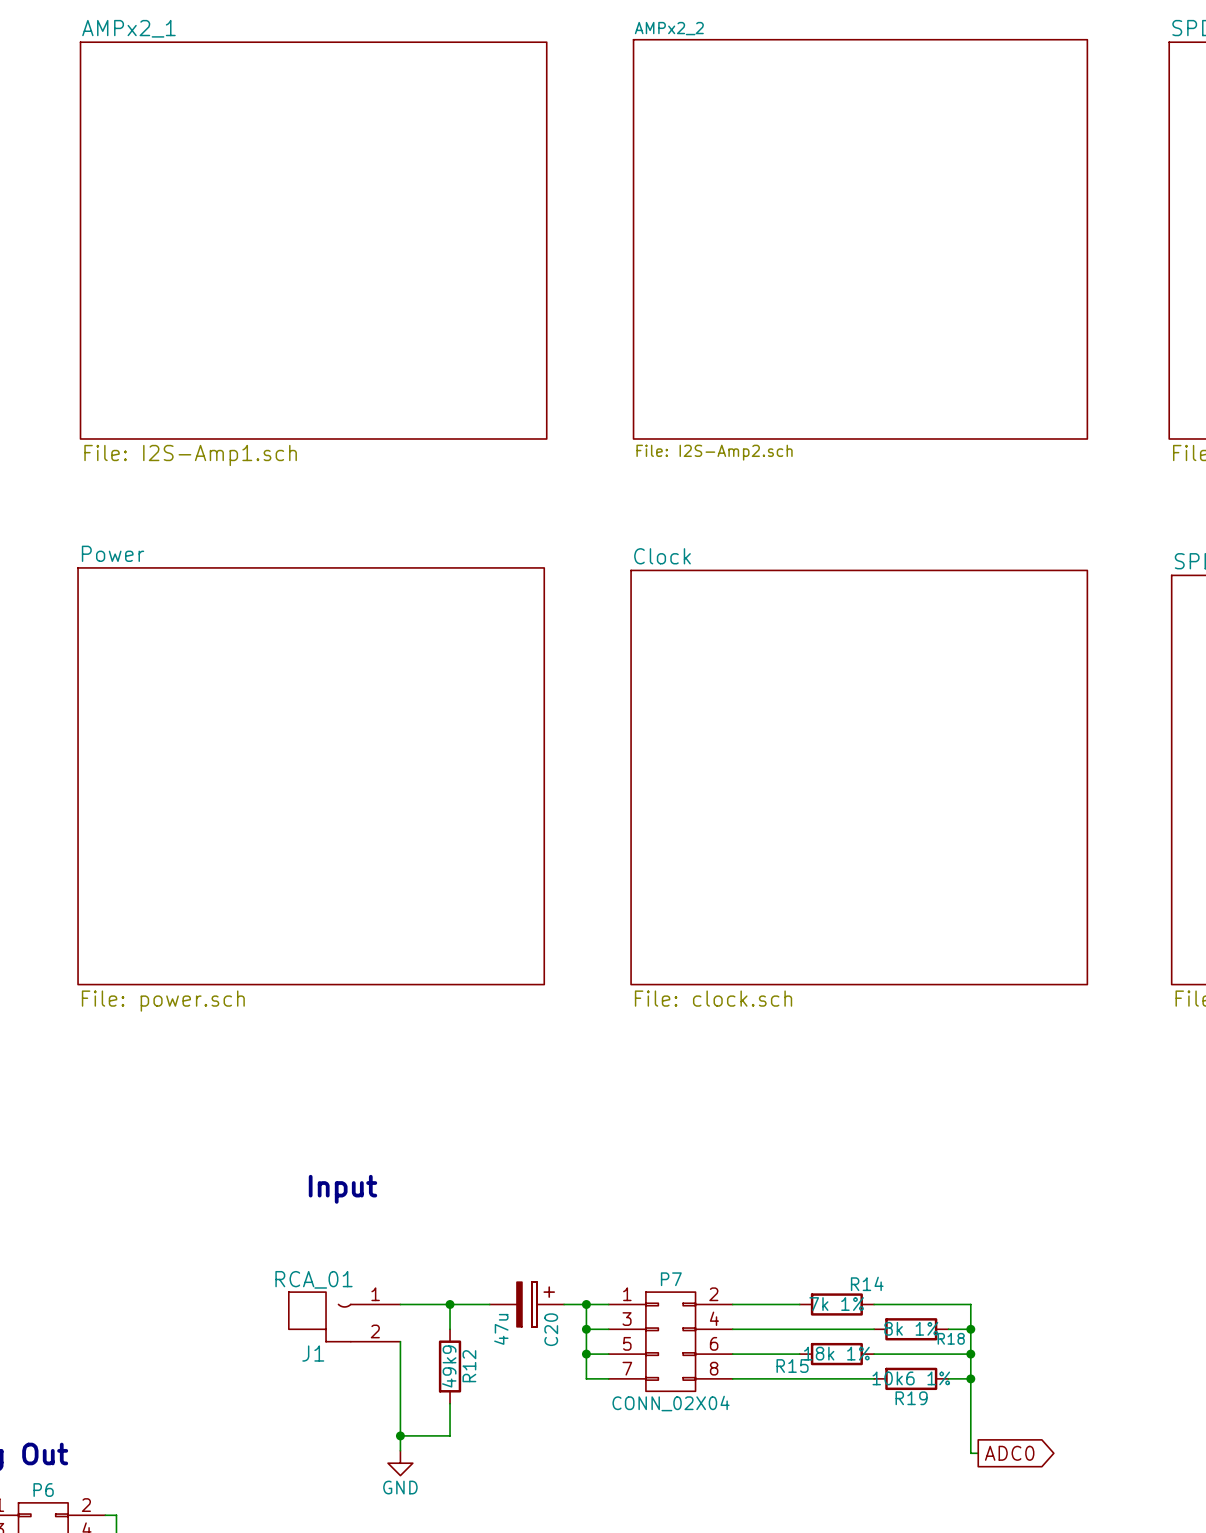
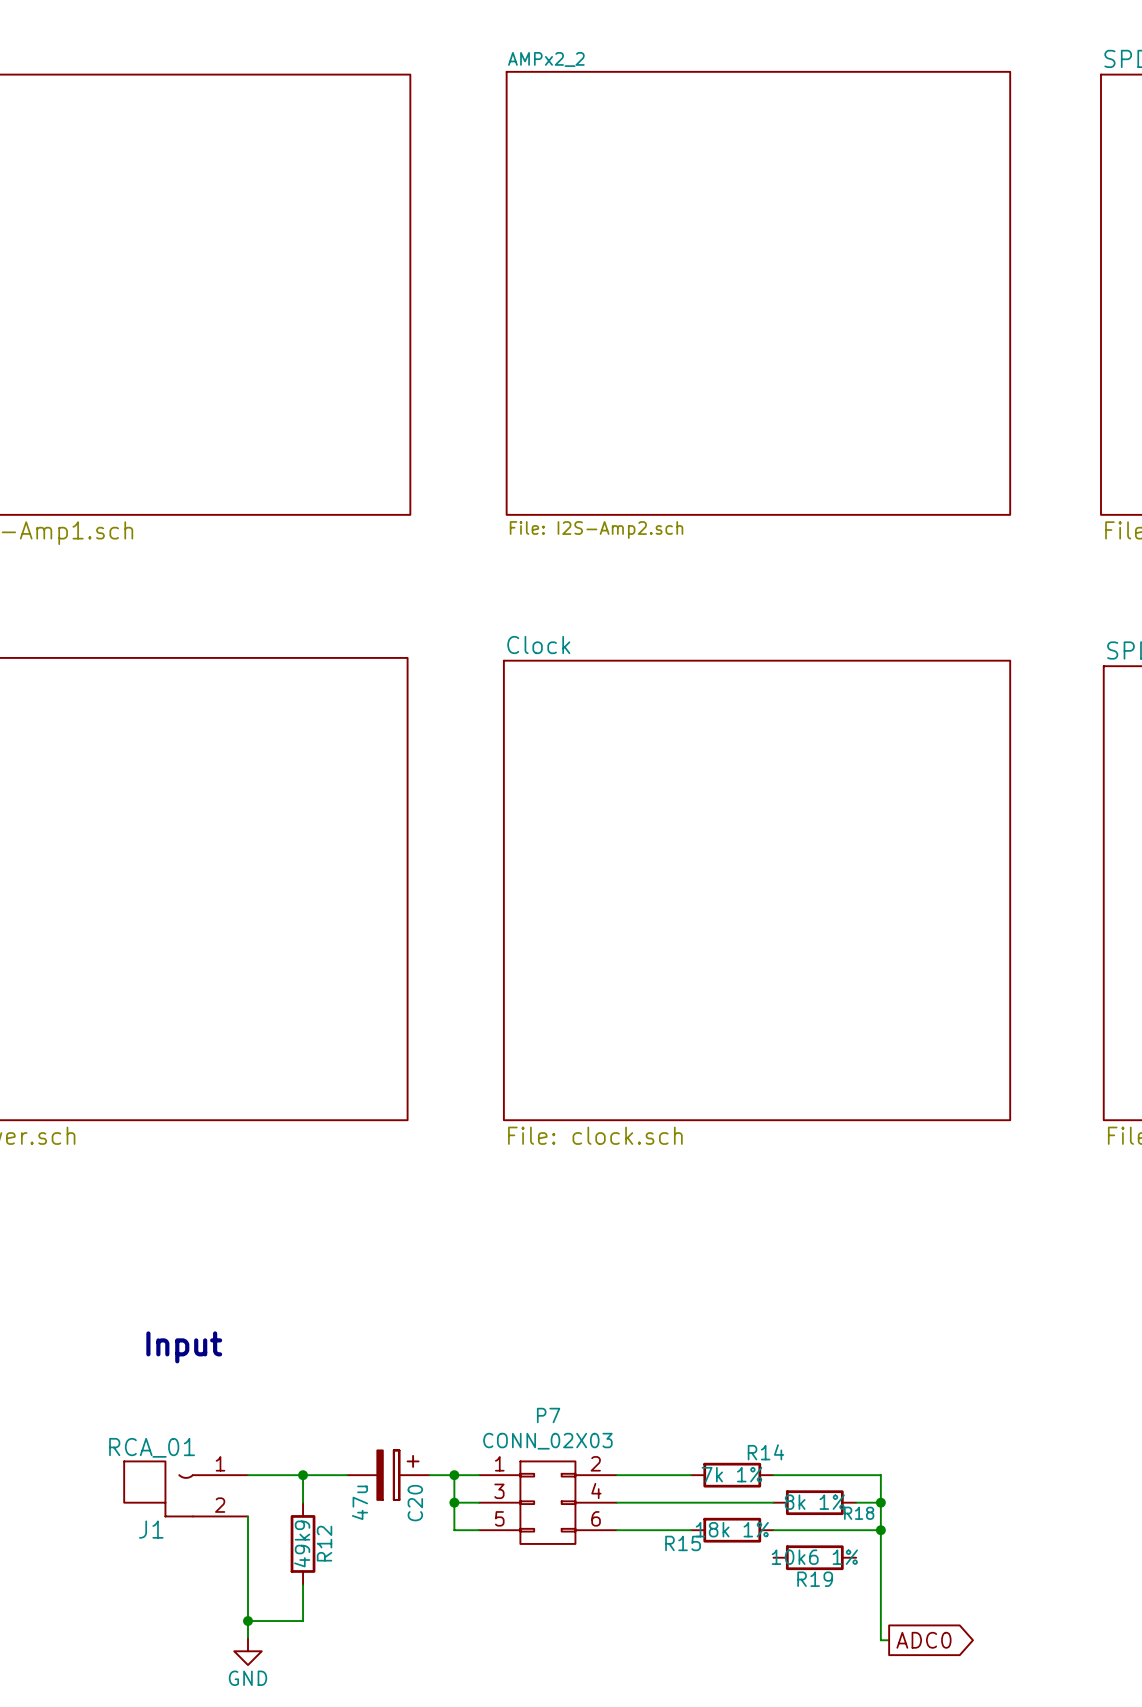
P7 symbol: [608, 1292, 733, 1392] -> [479, 1461, 617, 1544]
wire: (586, 1354) (586, 1378) (608, 1378) -> none
junction: (586, 1354) -> none
wire: (732, 1378) (874, 1378) -> none
wire: (948, 1378) (970, 1378) -> none
junction: (970, 1378) -> none
P7 value: CONN_02X04 (671, 1403) -> CONN_02X03 (547, 1441)

